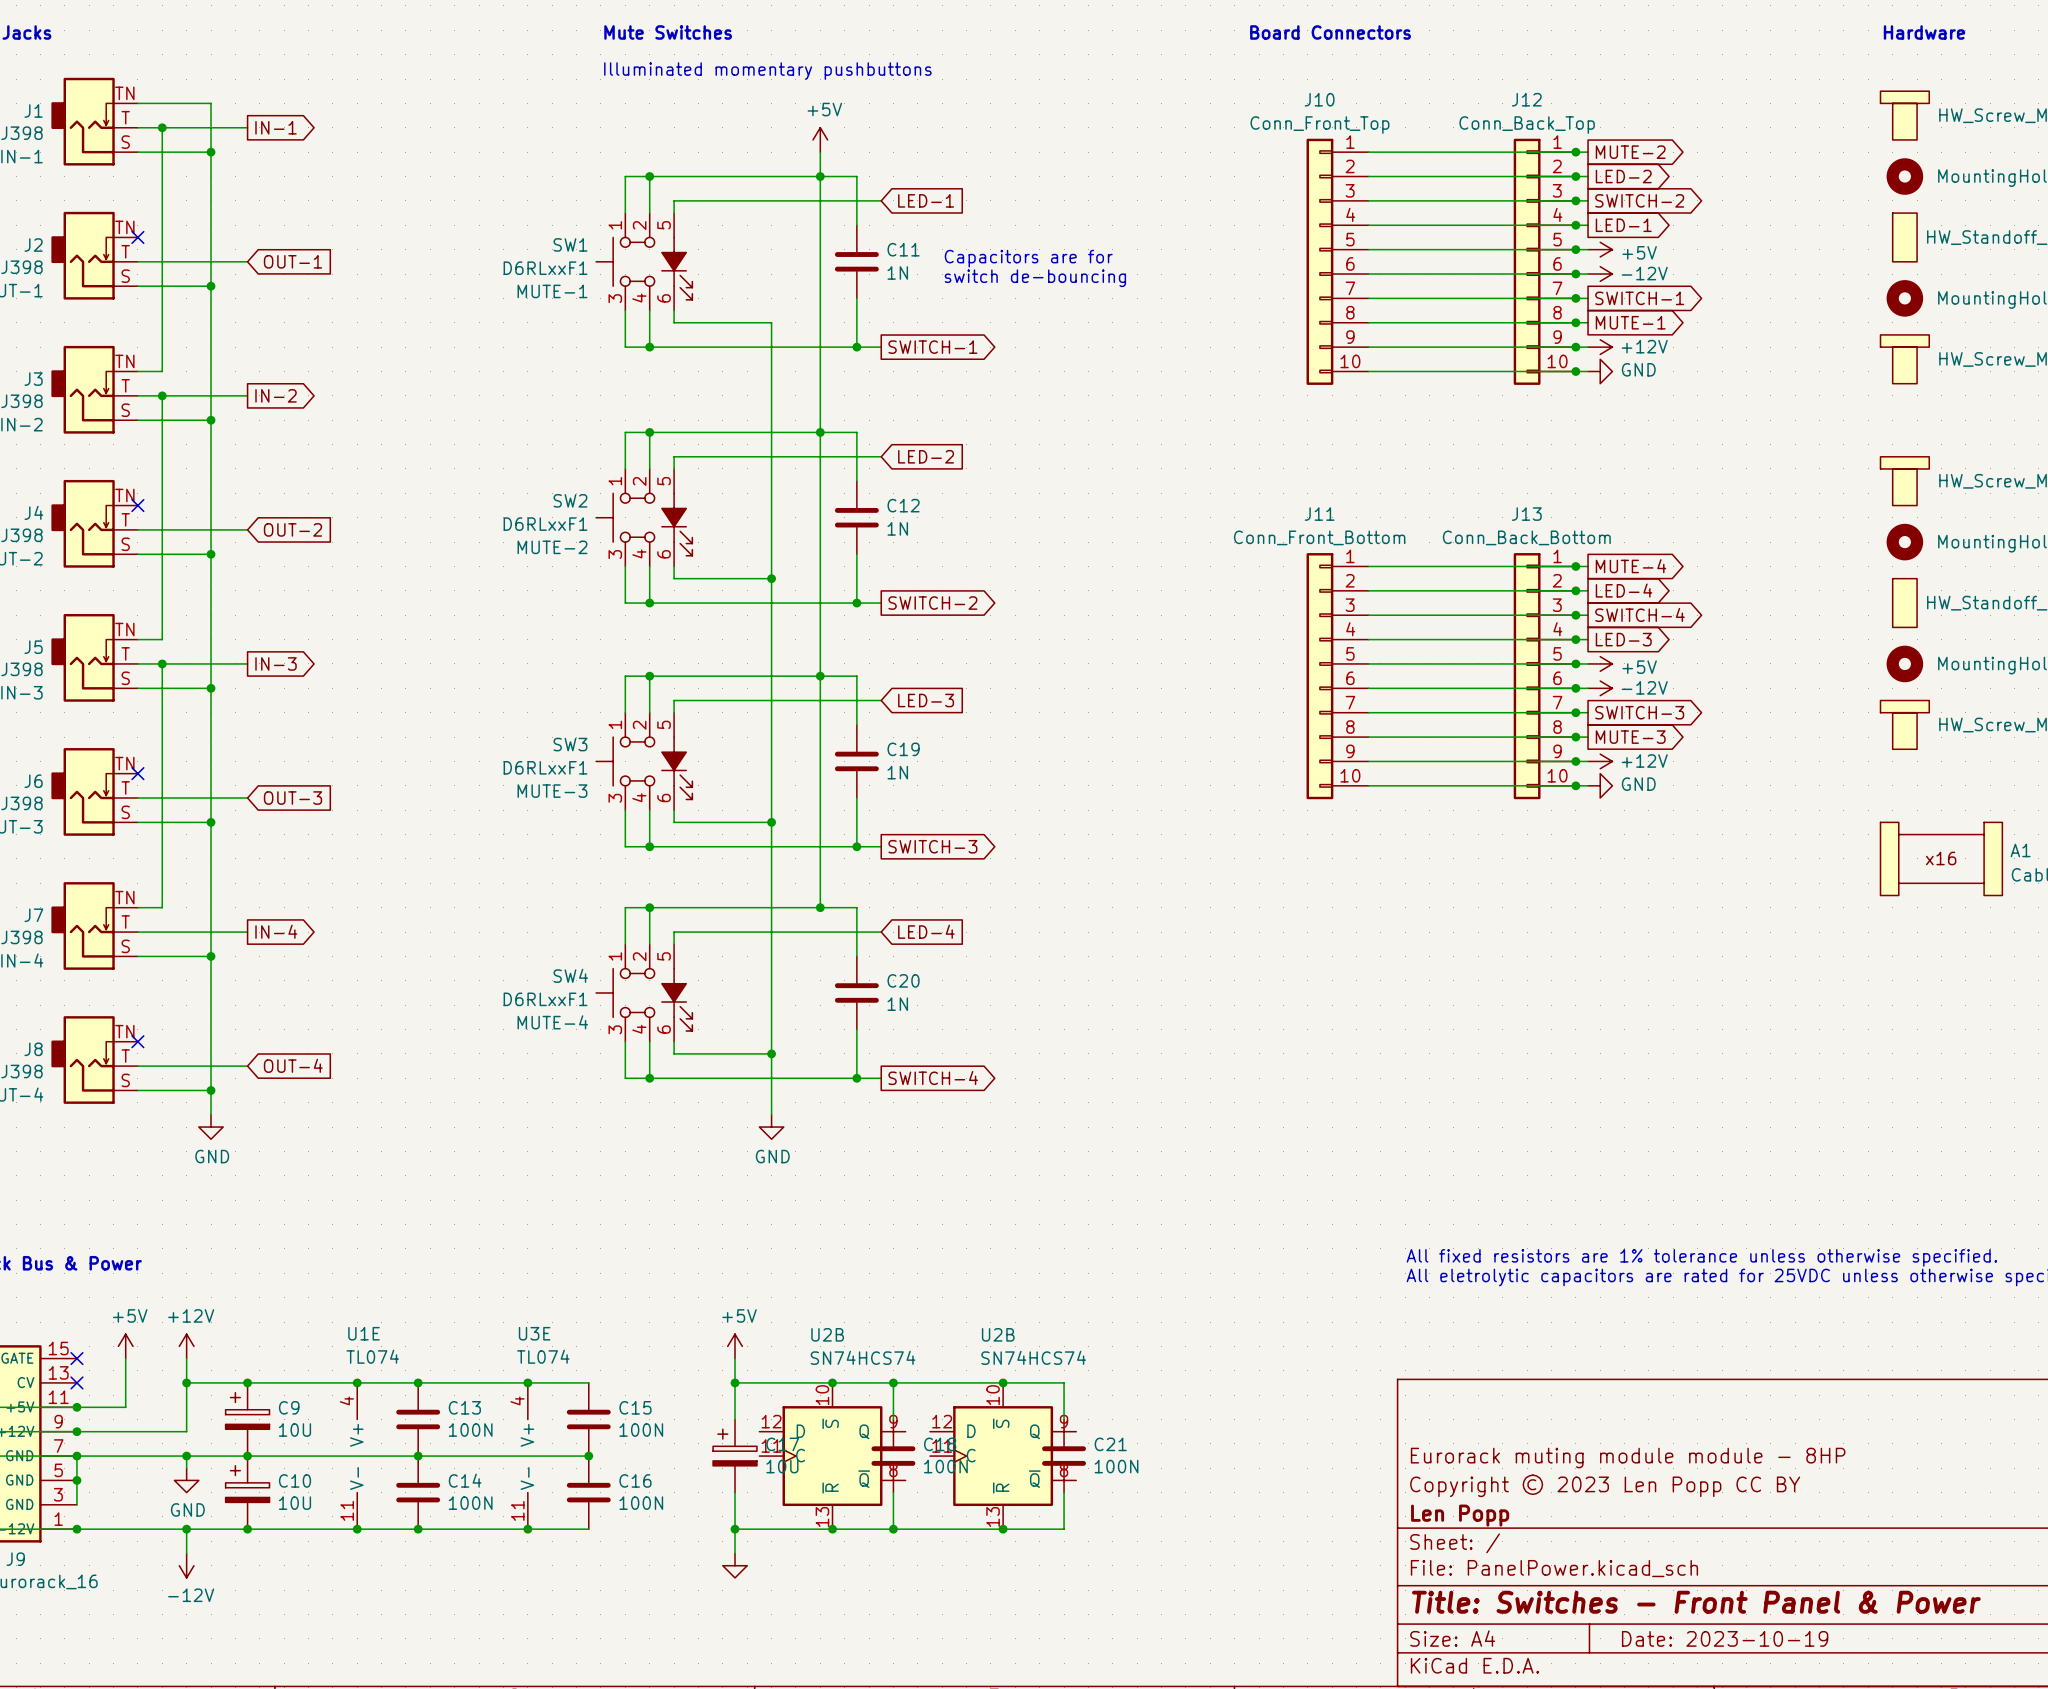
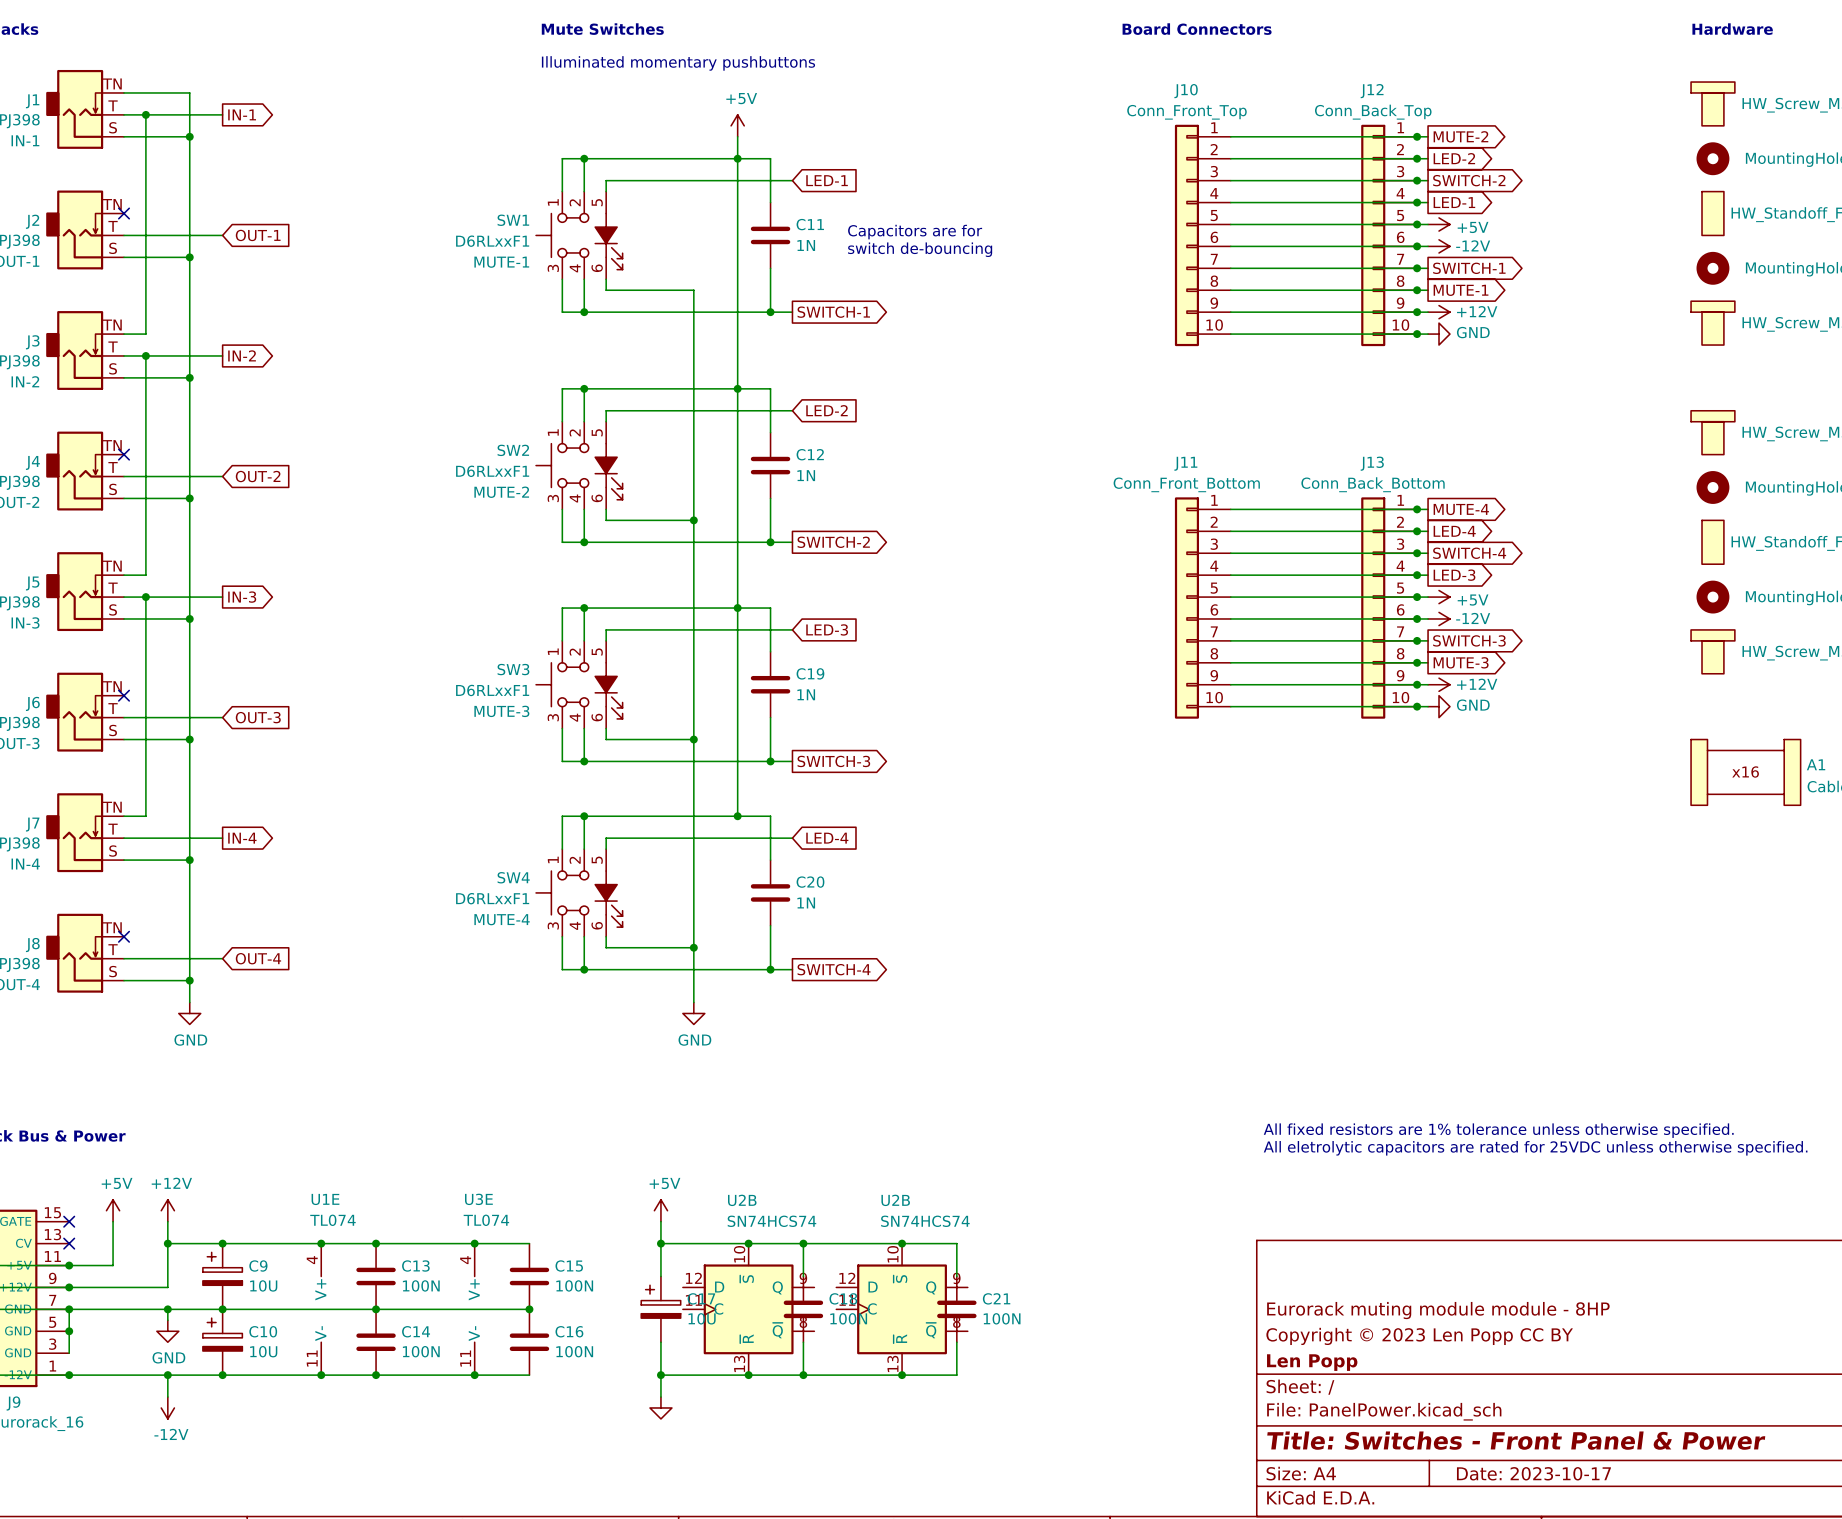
title block: Date: 2023-10-19 (1725, 1638) -> Date: 2023-10-17 (1533, 1473)

